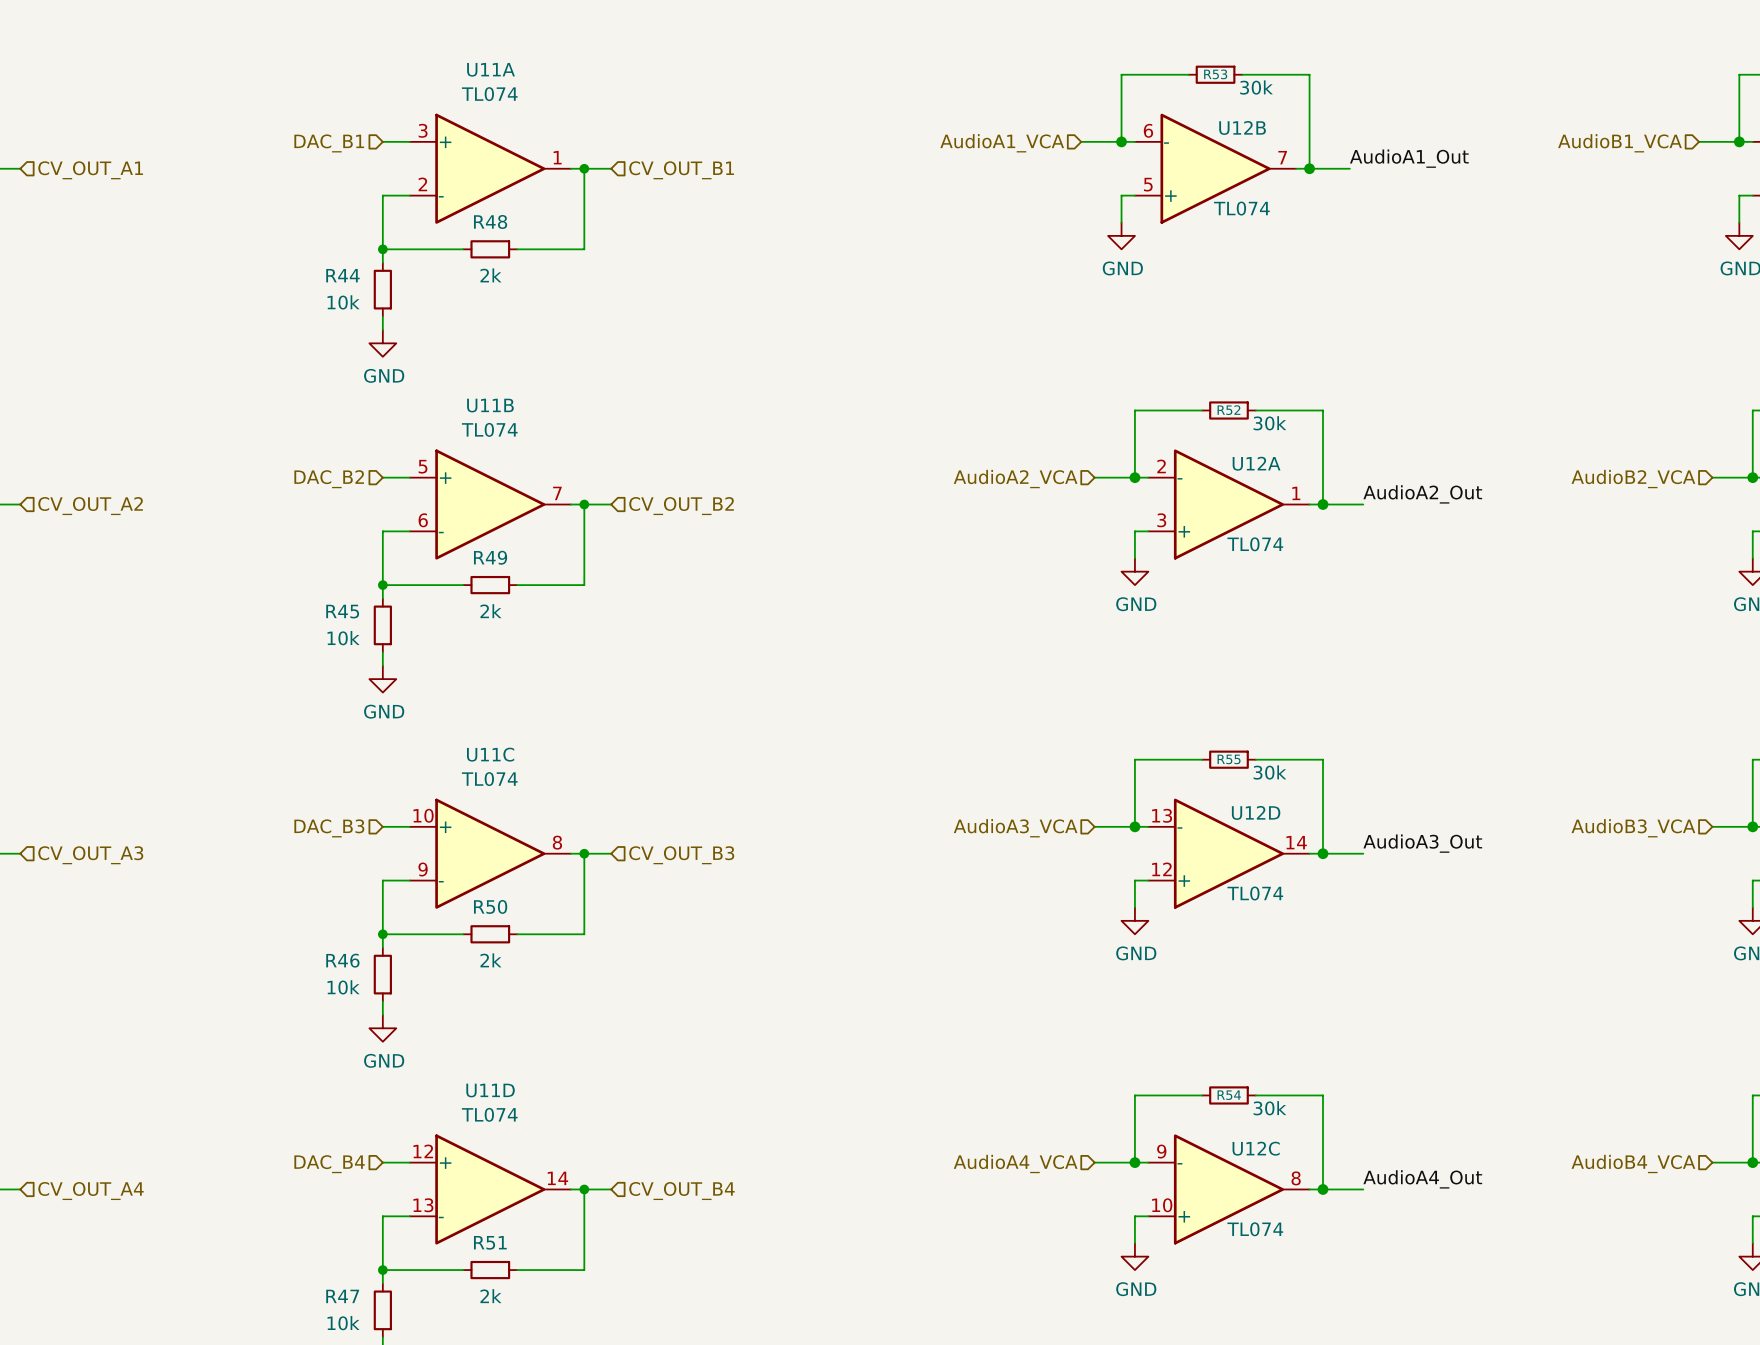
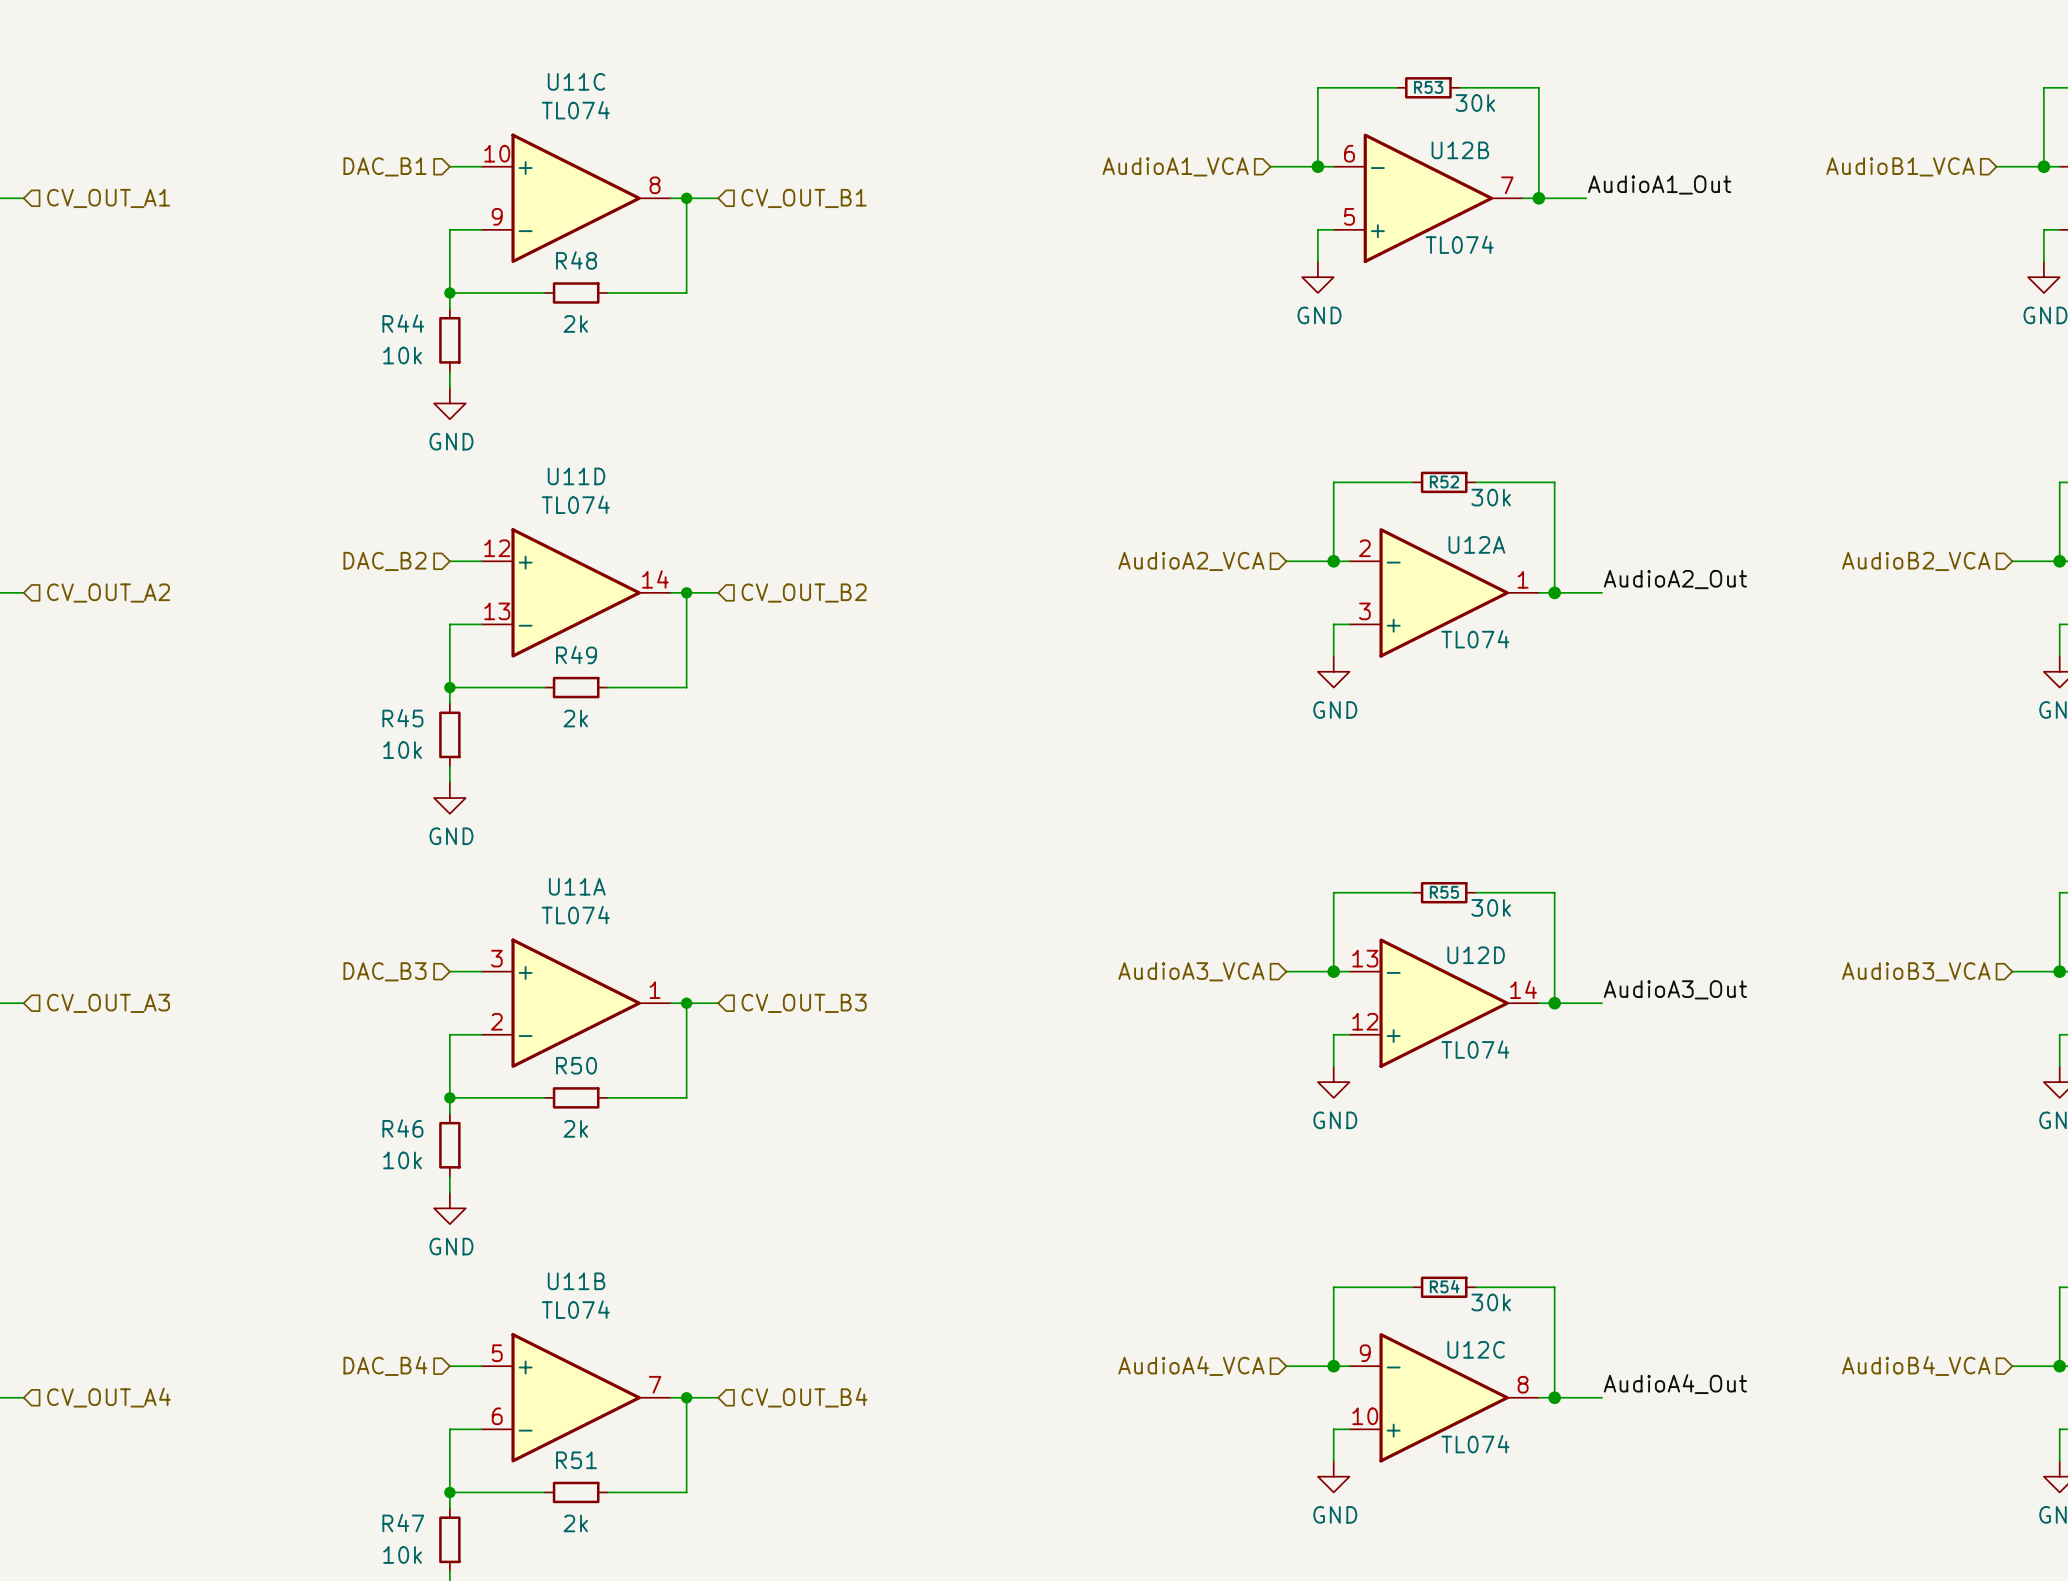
U11A position: (490, 168) -> (576, 1003)
U11B position: (490, 504) -> (576, 1397)
U11C position: (490, 853) -> (576, 198)
U11D position: (490, 1189) -> (576, 592)

